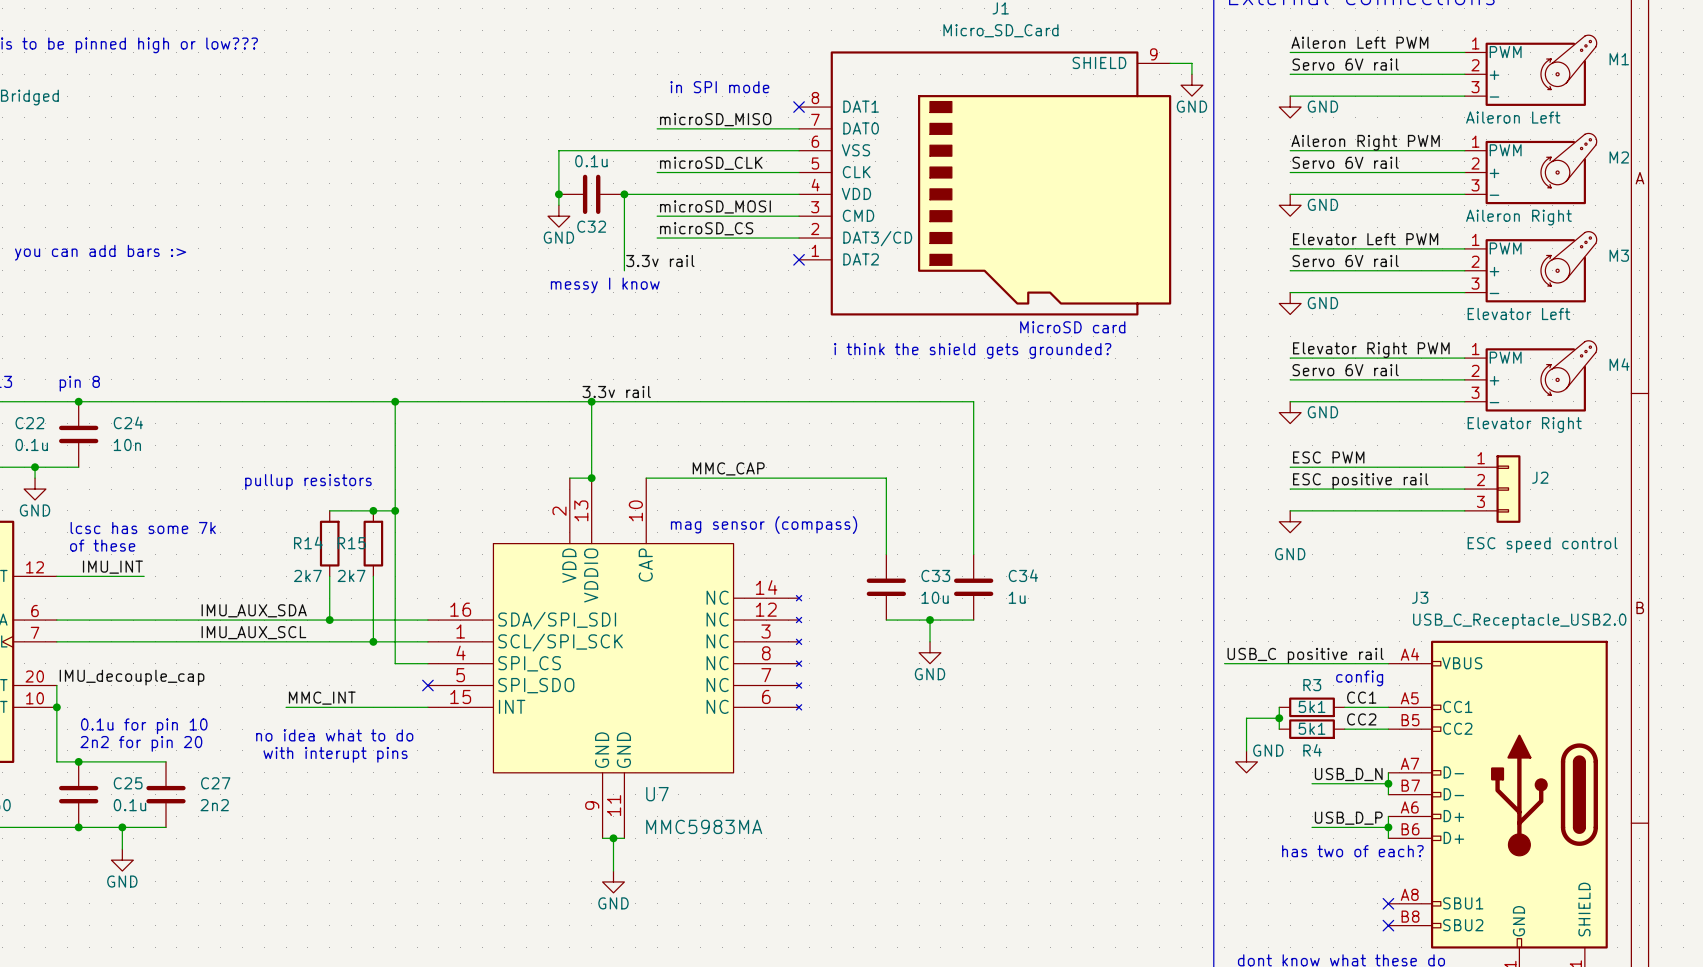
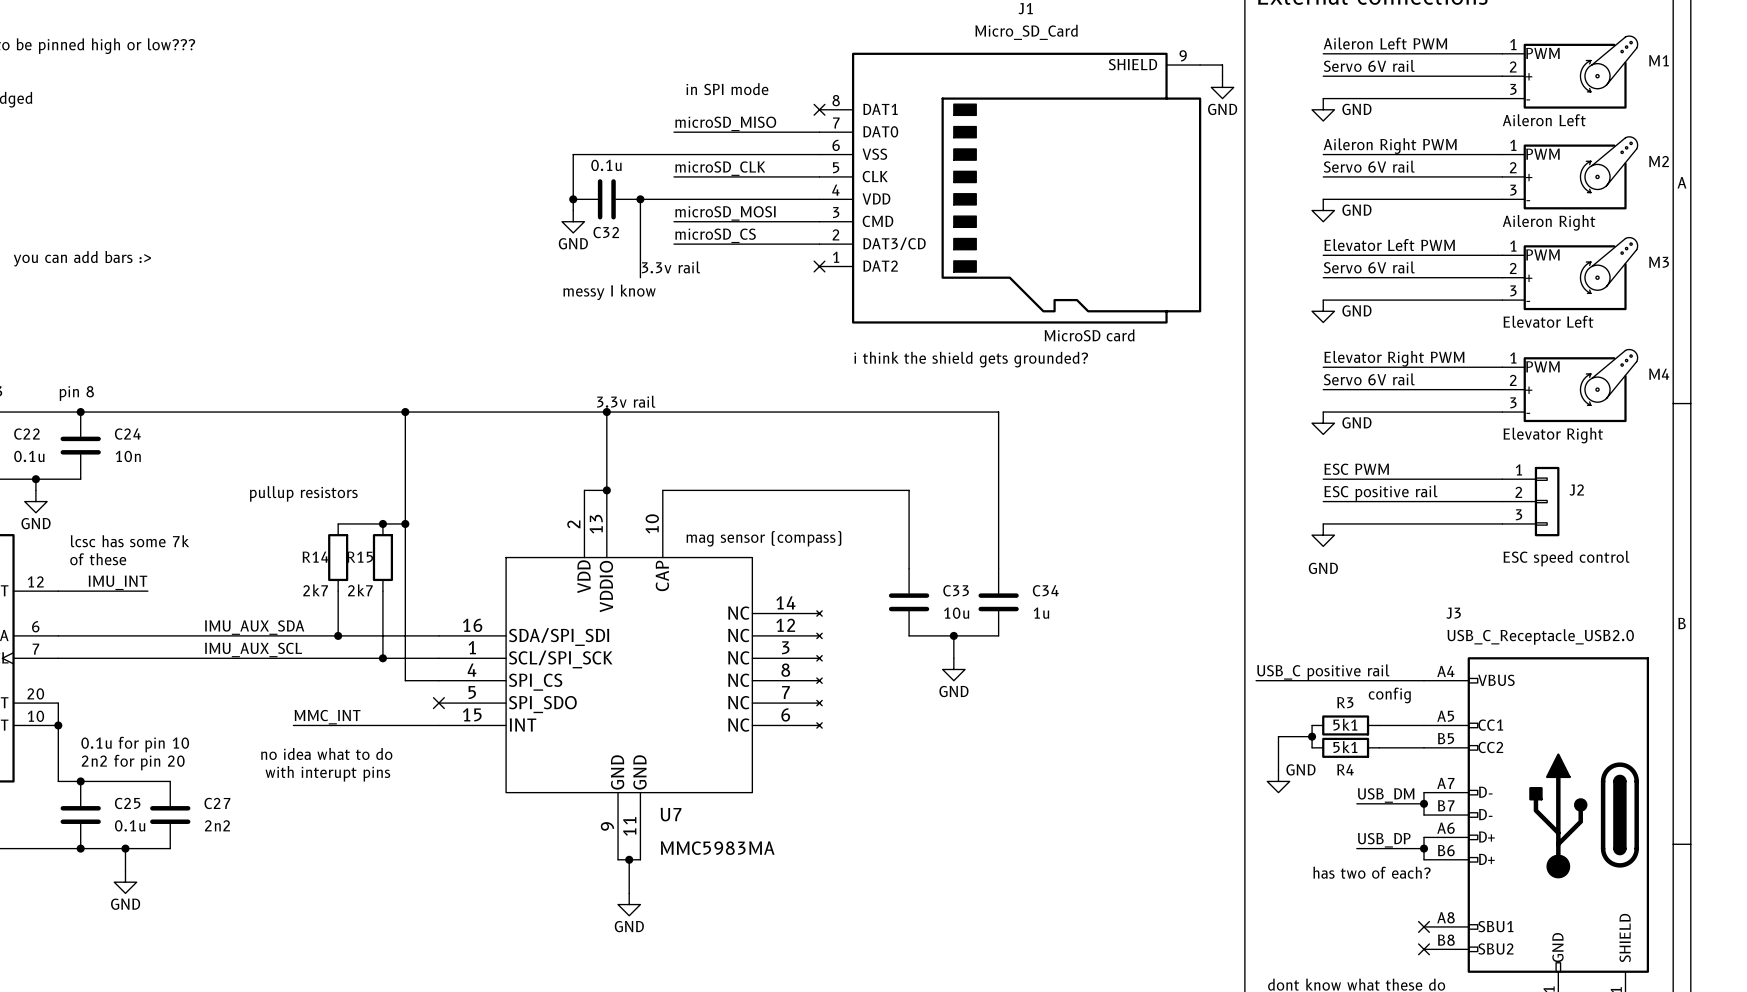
label: MMC_CAP (728, 468) -> none
label: IMU_decouple_cap (132, 677) -> none
label: CC1 (1361, 697) -> none
label: CC2 (1361, 719) -> none
label: USB_D_N (1348, 774) -> USB_DM (1386, 795)
wire: (1312, 783) (1322, 783) -> none
label: USB_D_P (1348, 818) -> USB_DP (1384, 840)
wire: (1312, 827) (1322, 827) -> none

